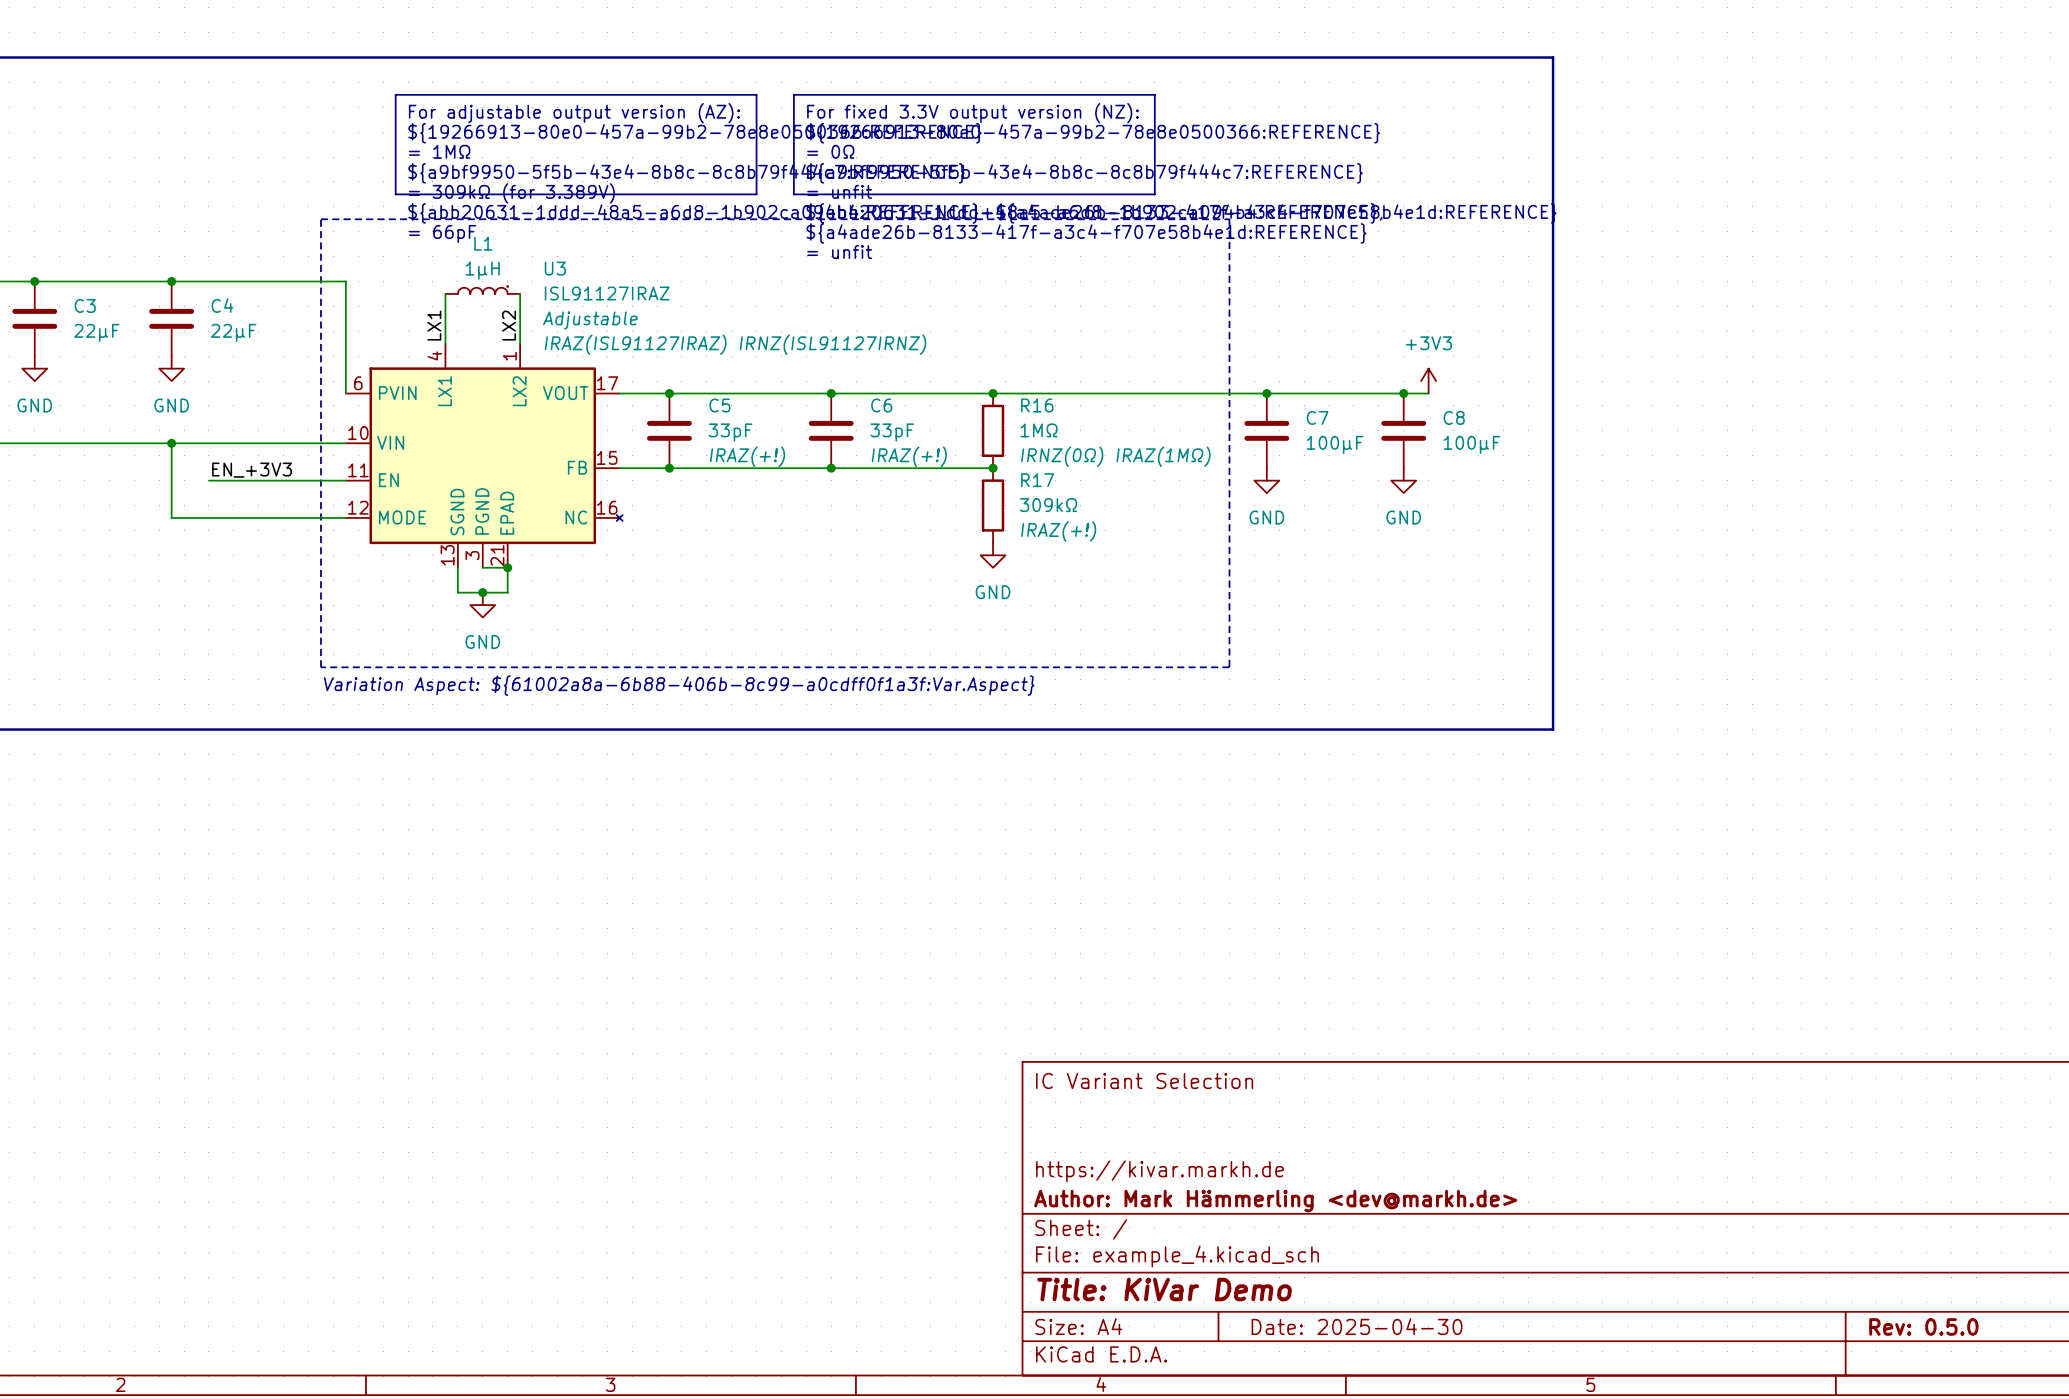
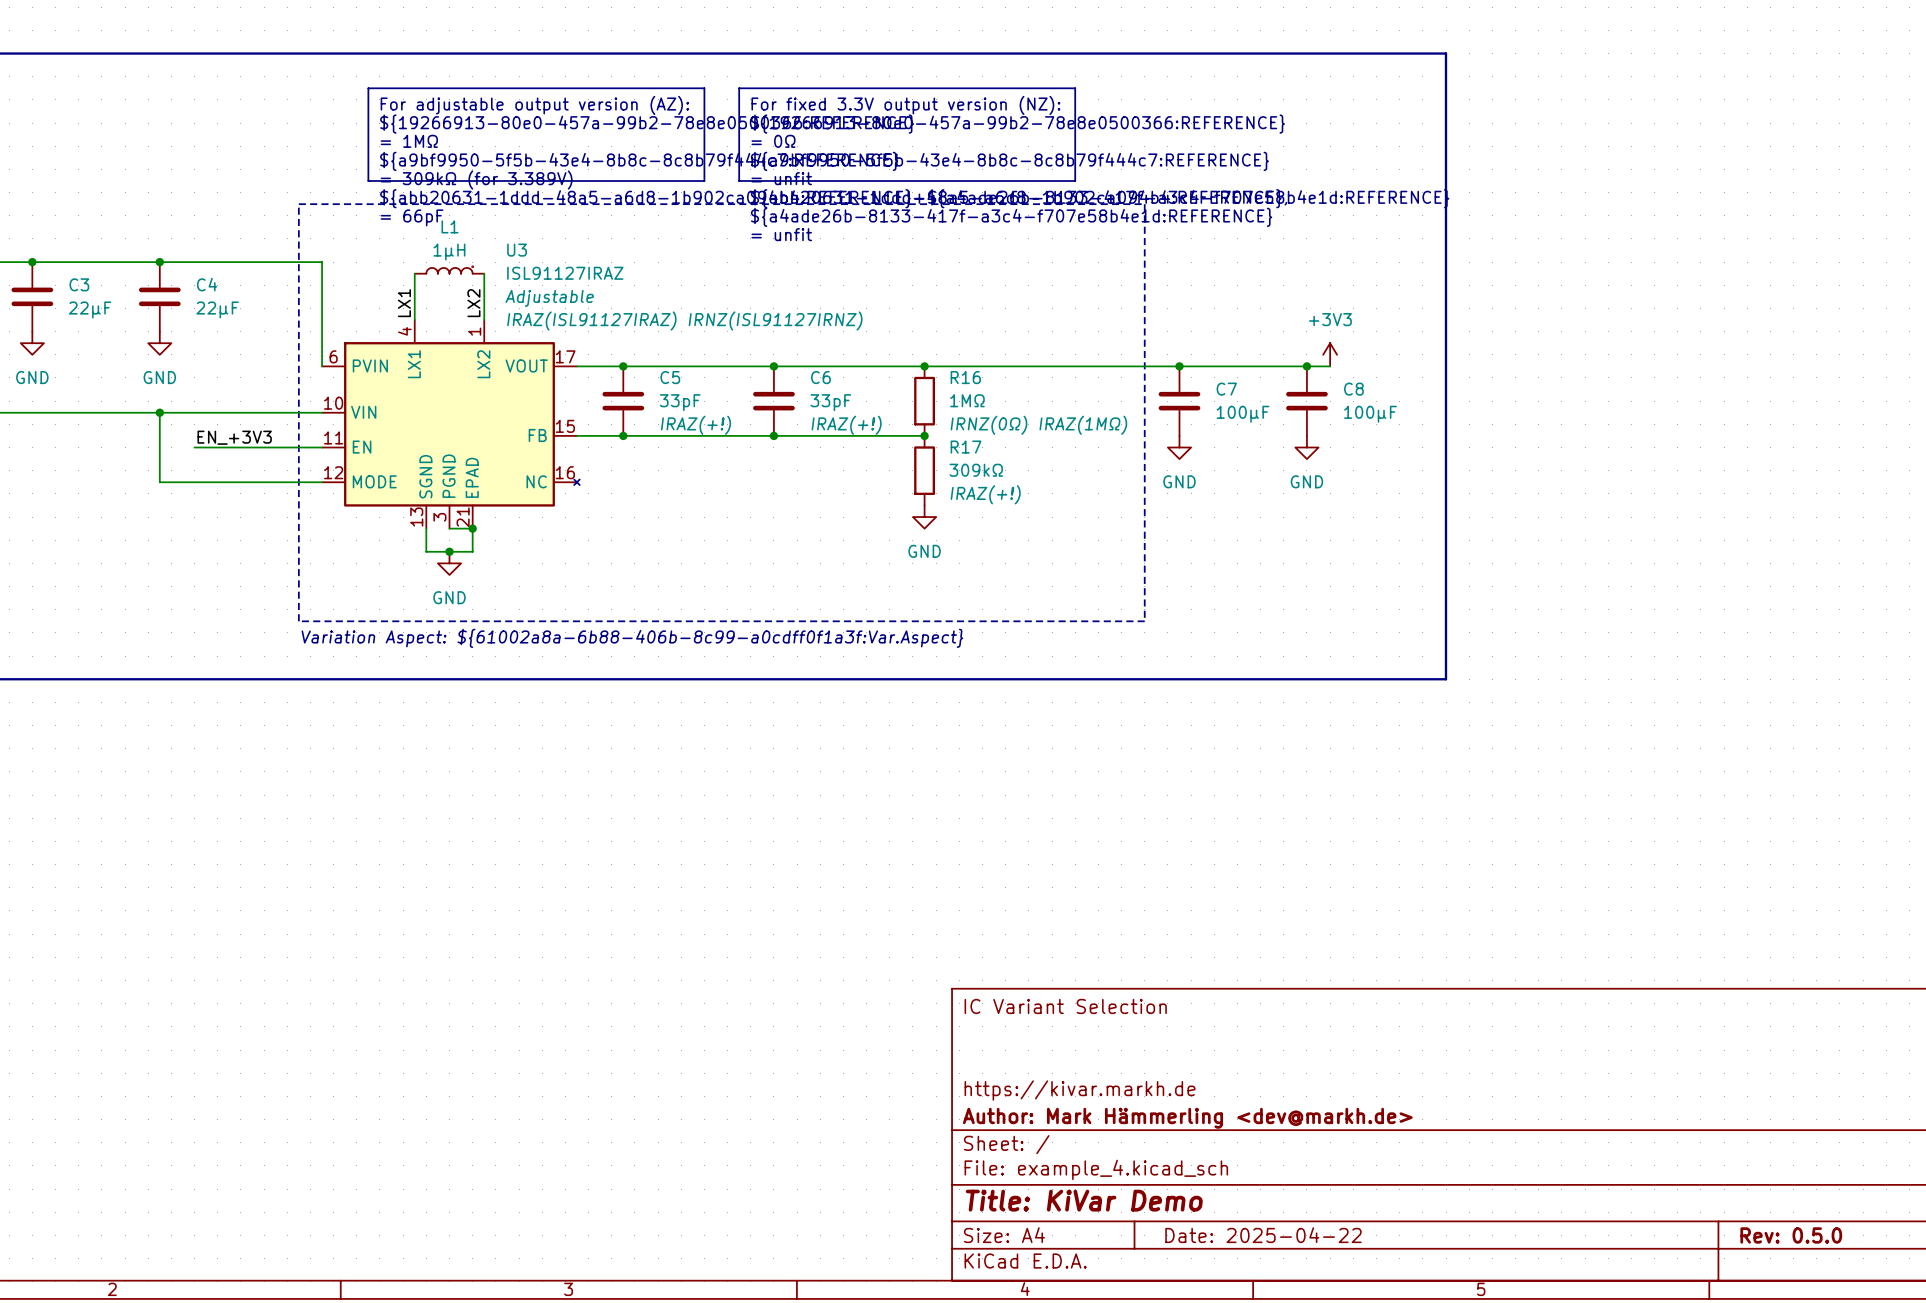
title block: Date: 2025-04-30 (1357, 1326) -> Date: 2025-04-22 (1263, 1235)

